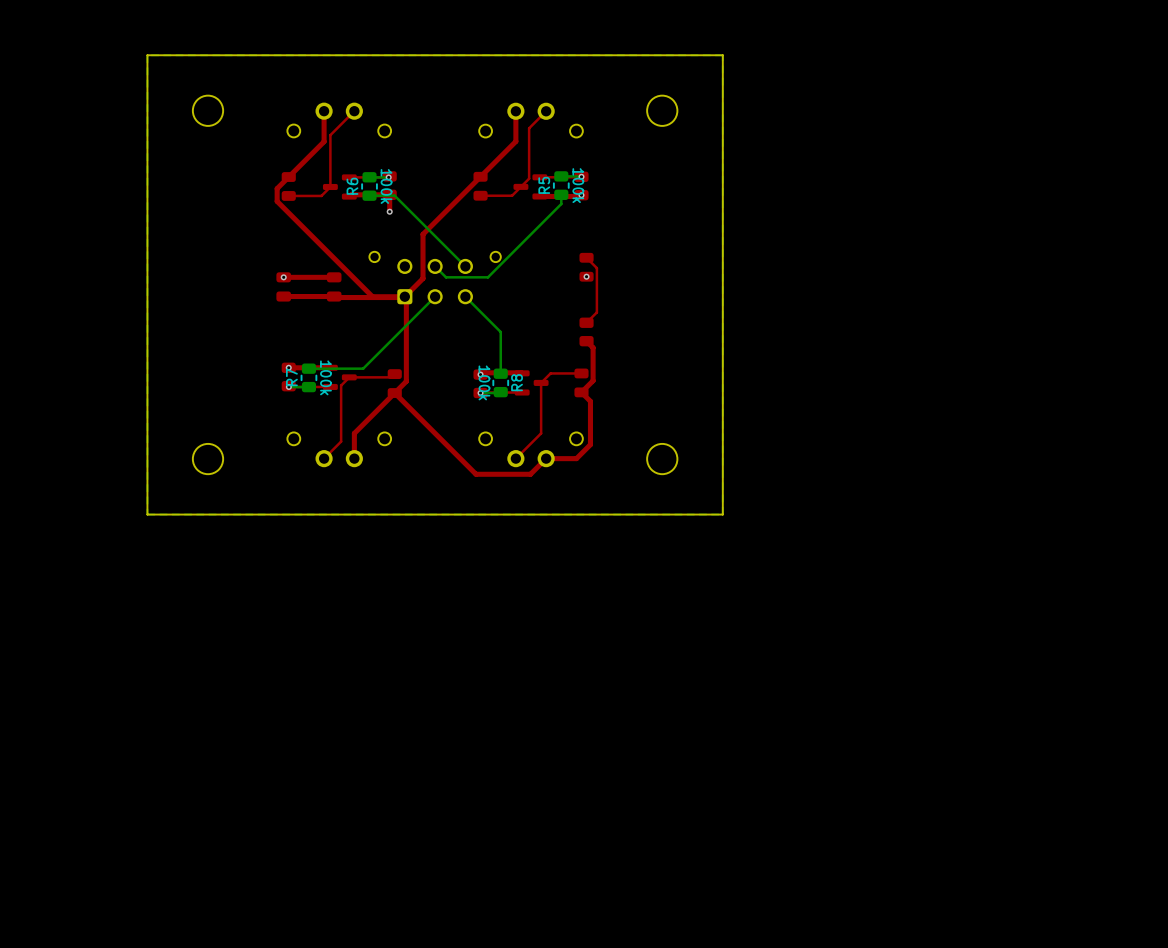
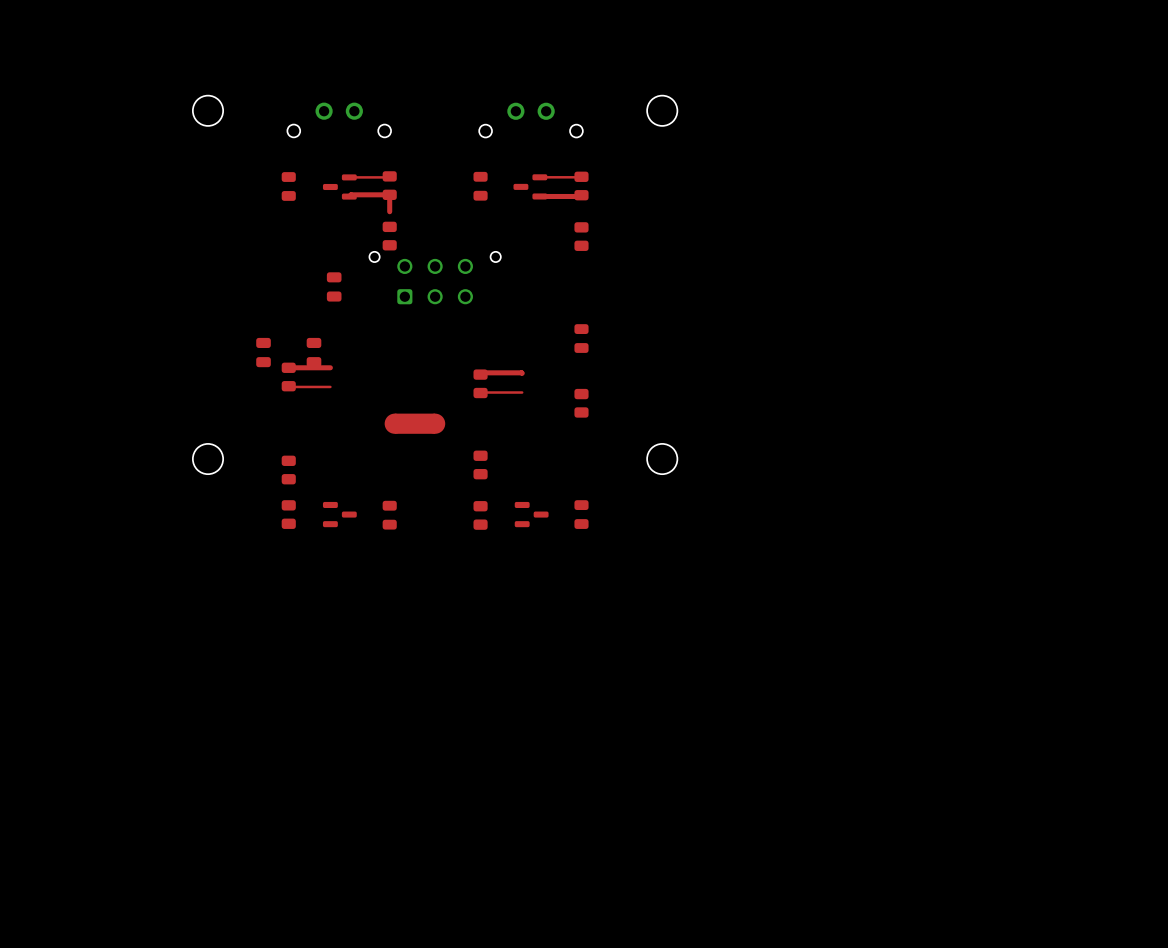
board edge: (722, 55) (147, 55) (147, 514) (722, 514) (722, 55) -> none
top track: (324, 111) (324, 141) (277, 188) (277, 201) (372, 296) (404, 296) -> none
top track: (354, 111) (330, 135) (330, 186) (321, 195) (288, 195) -> none
top track: (515, 111) (515, 141) (423, 234) (423, 278) (404, 296) -> none
top track: (546, 111) (529, 128) (529, 178) (512, 195) (480, 195) -> none
bottom track: (561, 176) (581, 176) -> none
via: (581, 176) -> none
bottom track: (388, 177) (369, 177) -> none
via: (388, 177) -> none
R5 side: bottom (561, 185) -> top (581, 236)
R6 side: bottom (369, 186) -> top (389, 236)
bottom track: (561, 194) (561, 204) (487, 277) (446, 277) (435, 266) -> none
bottom track: (369, 195) (394, 195) (465, 266) -> none
via: (581, 195) -> none
via: (389, 211) -> none
top track: (586, 257) (596, 268) (596, 312) (586, 322) -> none
part: (586, 267) -> none
via: (586, 276) -> none
via: (283, 277) -> none
top track: (334, 277) (283, 277) -> none
part: (283, 286) -> none
top track: (283, 296) (404, 297) -> none
top track: (404, 296) (406, 381) (354, 433) (354, 458) -> none
bottom track: (435, 296) (363, 368) (308, 368) -> none
bottom track: (465, 296) (500, 332) (500, 373) -> none
part footprint: [579, 317, 594, 347] -> [574, 324, 589, 353]
top track: (586, 341) (593, 347) (593, 380) (581, 392) (590, 401) (590, 444) (576, 458) (546, 458) (530, 474) (476, 474) (394, 393) -> none
part: none -> (263, 352)
part: none -> (313, 352)
via: (288, 367) -> none
top track: (581, 373) (550, 373) (541, 382) (541, 433) (515, 458) -> none
top track: (394, 374) (391, 377) (349, 377) (341, 385) (341, 441) (324, 458) -> none
via: (480, 374) -> none
R7 side: bottom (308, 377) -> top (288, 470)
part: (339, 377) -> none
R8 side: bottom (500, 382) -> top (480, 464)
part: (531, 382) -> none
part: (581, 382) -> none
part: (394, 383) -> none
via: (288, 386) -> none
bottom track: (308, 387) (289, 387) -> none
bottom track: (500, 392) (480, 393) -> none
via: (480, 393) -> none
part: none -> (581, 403)
part: none -> (414, 423)
part: (339, 449) -> none
part: (531, 449) -> none
part: none -> (288, 514)
part: none -> (339, 514)
part: none -> (531, 514)
part: none -> (581, 514)
part: none -> (389, 515)
part: none -> (480, 515)

